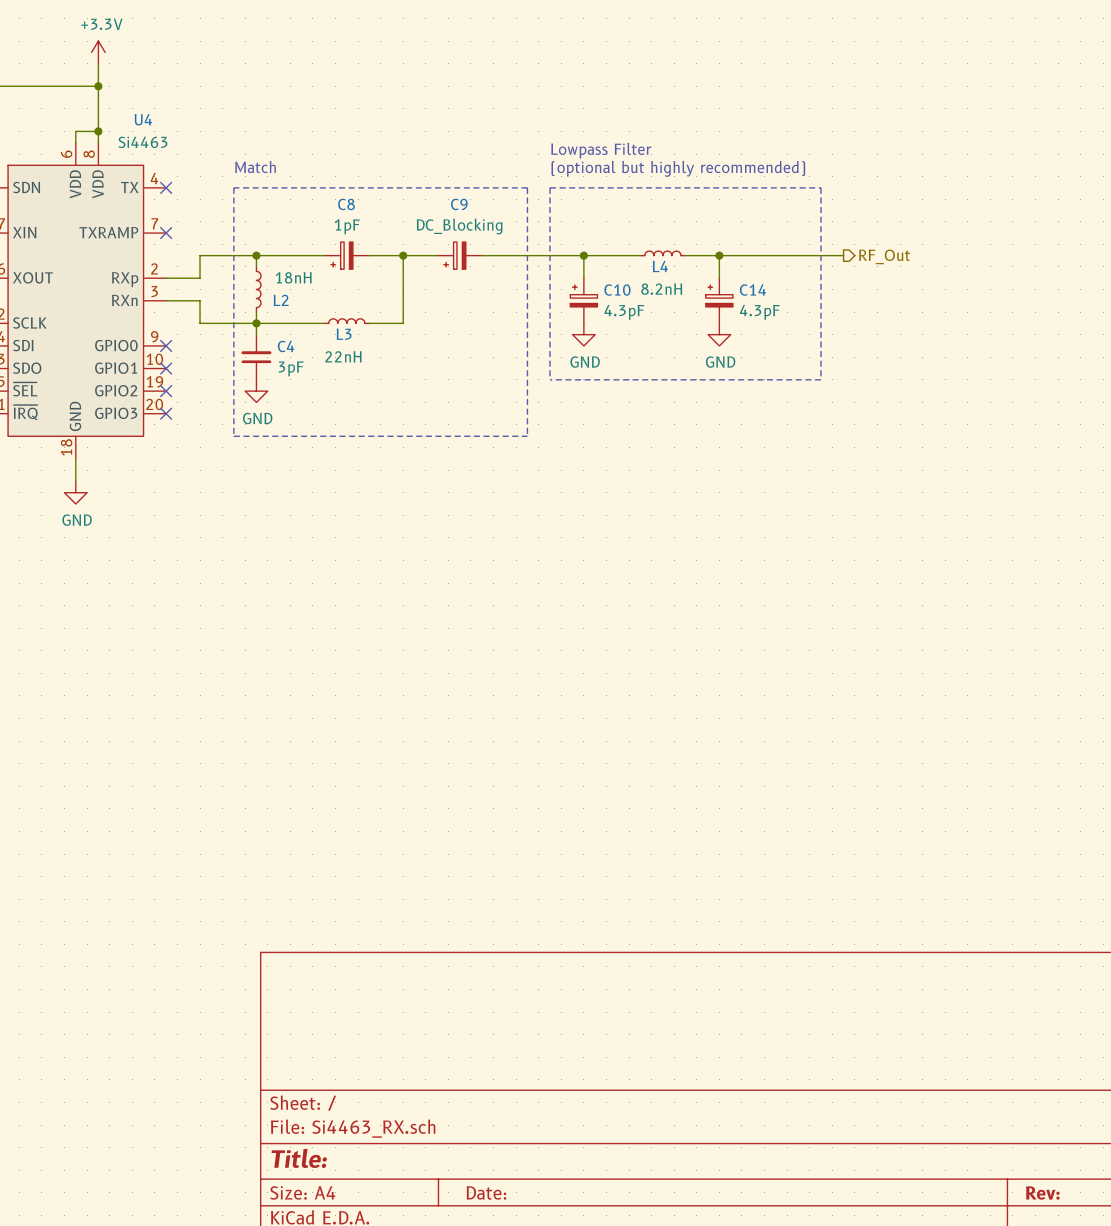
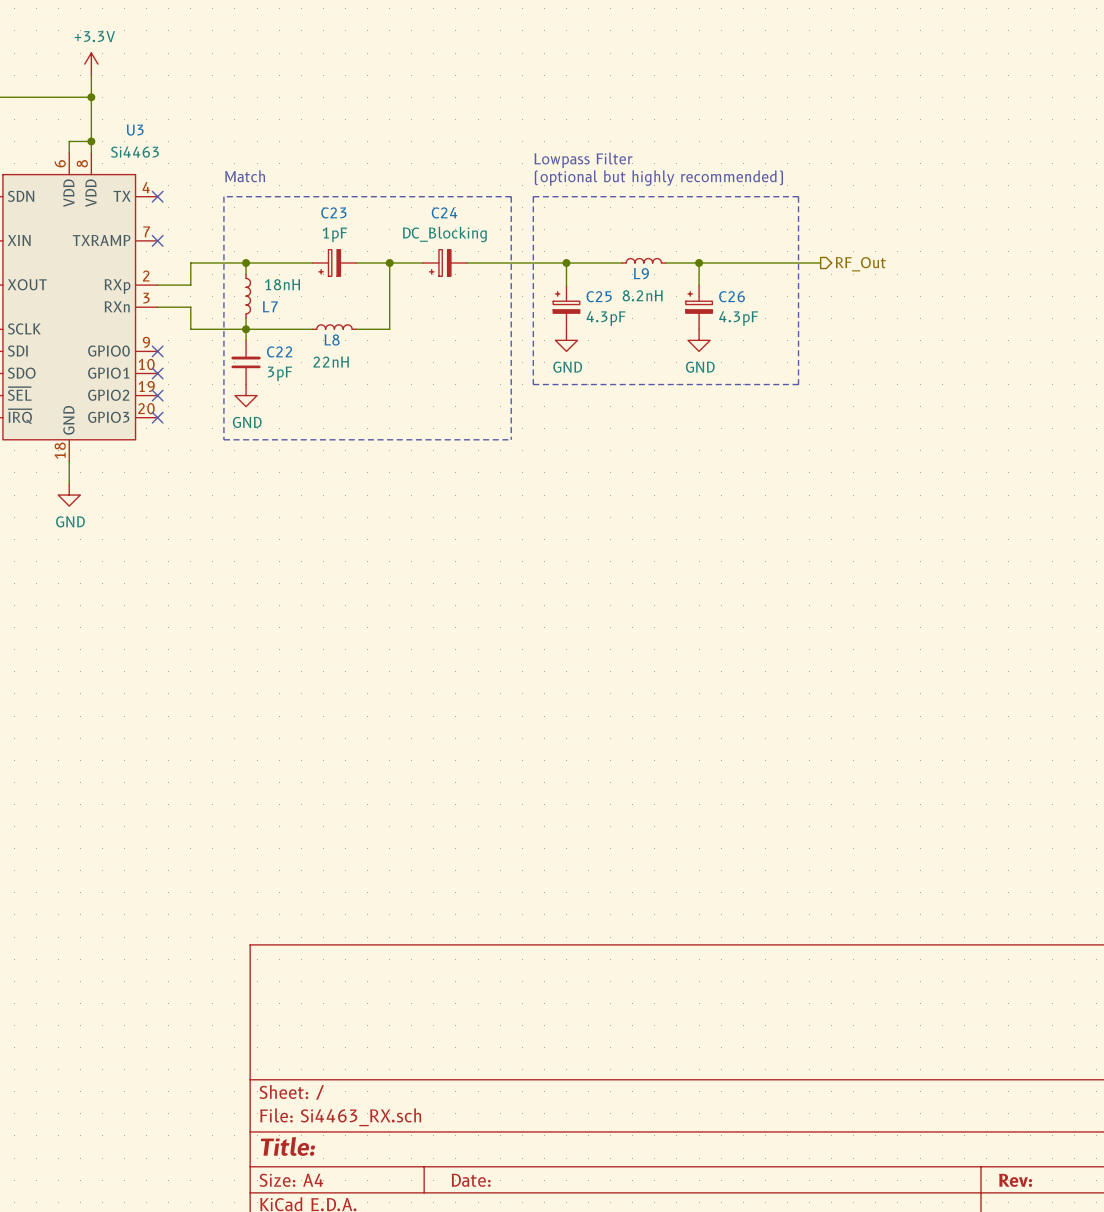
U4 name: U4 (143, 119) -> U3 (135, 130)
C8 name: C8 (346, 204) -> C23 (333, 212)
C9 name: C9 (459, 204) -> C24 (444, 212)
L4 name: L4 (660, 266) -> L9 (641, 273)
C10 name: C10 (617, 290) -> C25 (599, 296)
C14 name: C14 (752, 290) -> C26 (732, 296)
L2 name: L2 (281, 300) -> L7 (270, 306)
L3 name: L3 (344, 334) -> L8 (332, 339)
C4 name: C4 (286, 346) -> C22 (279, 351)

